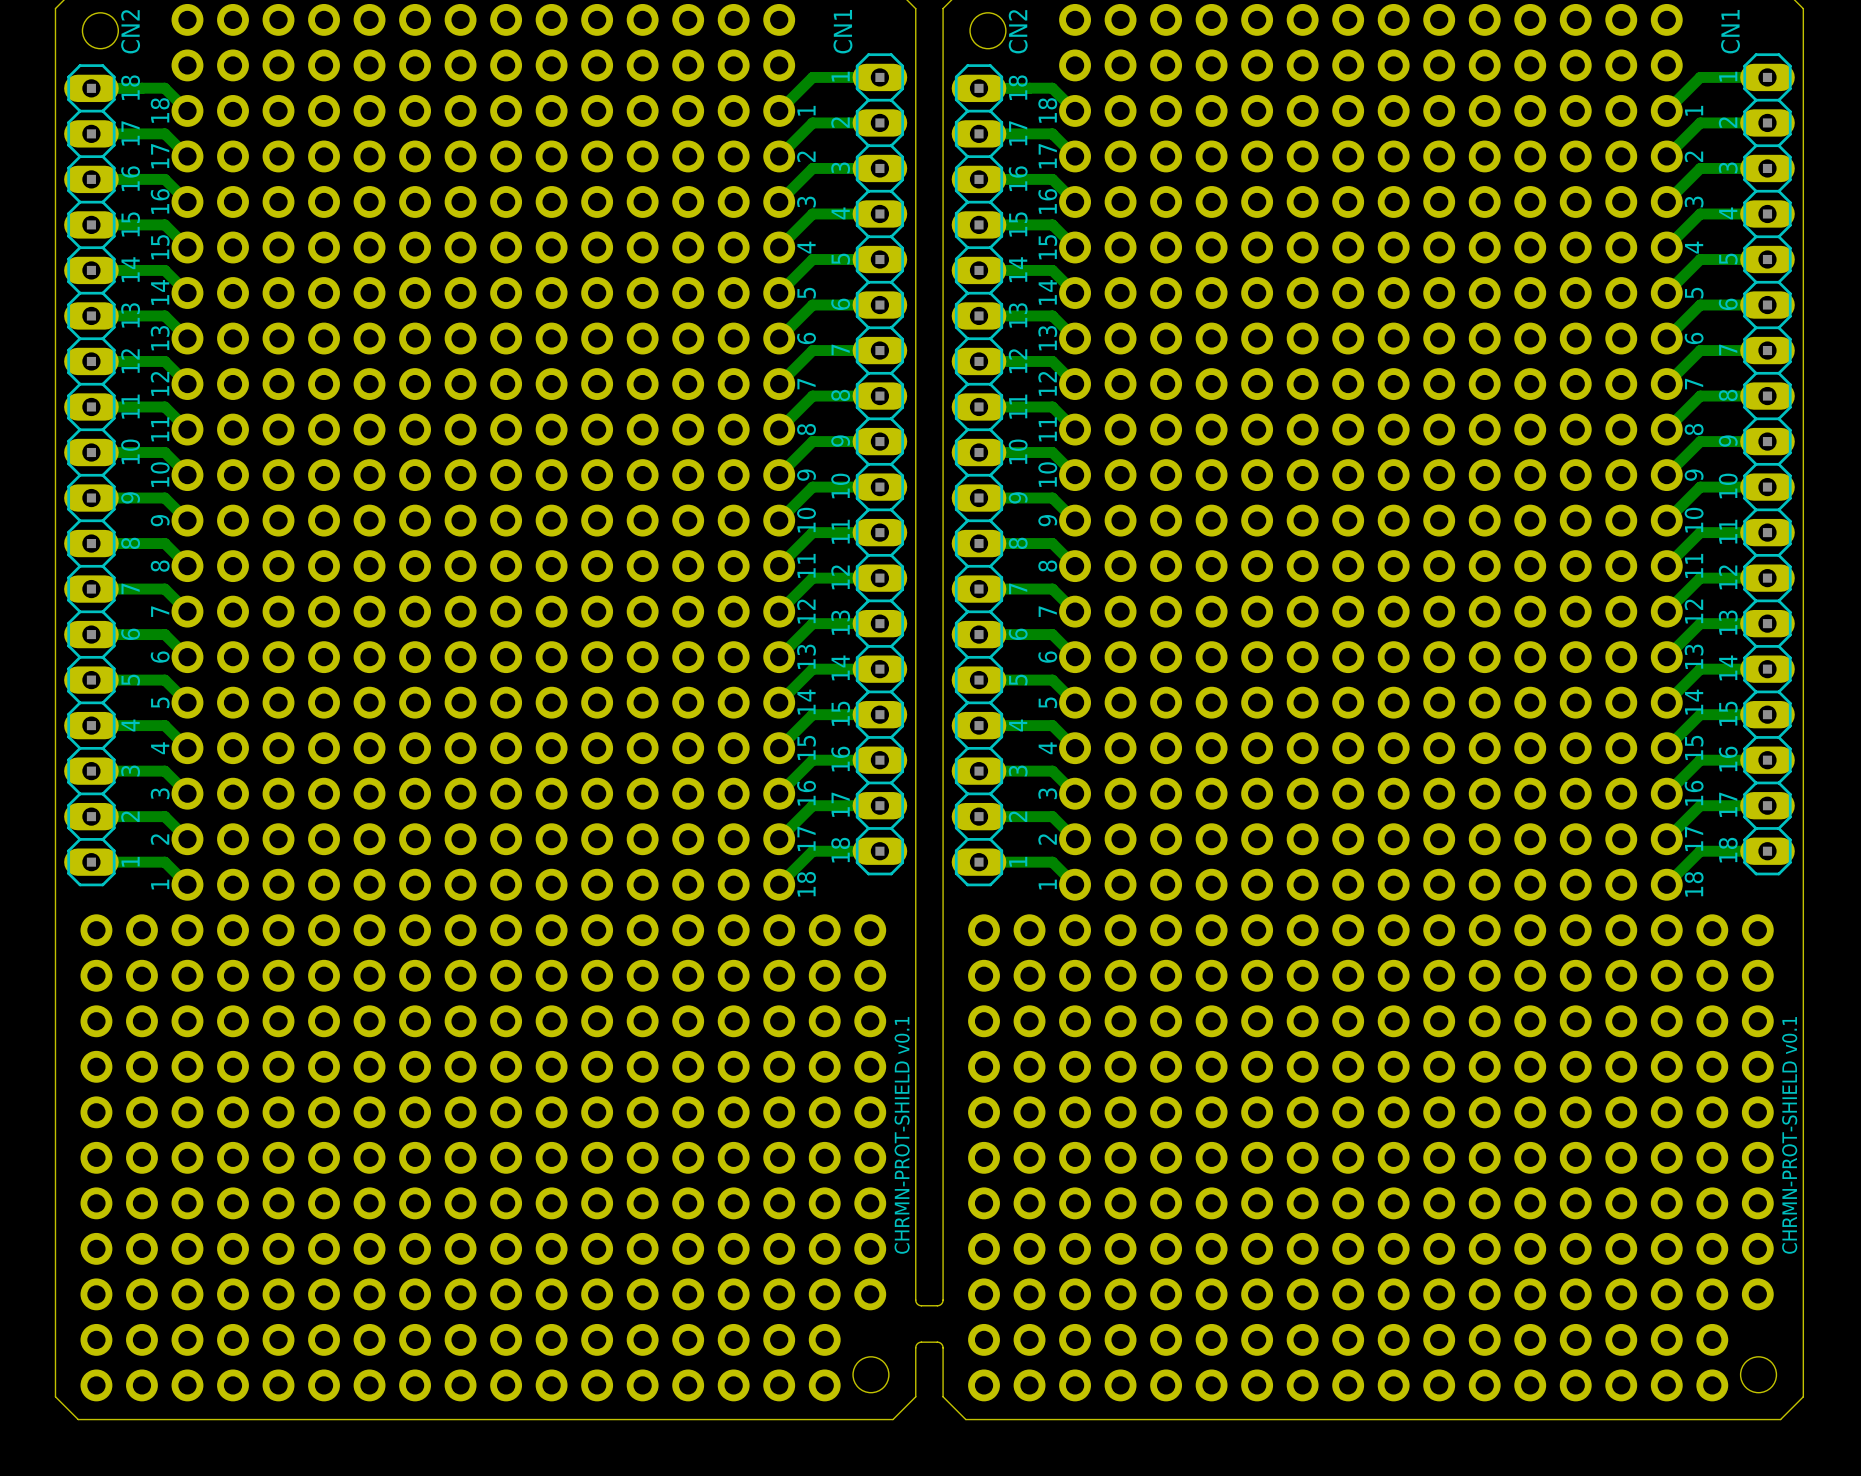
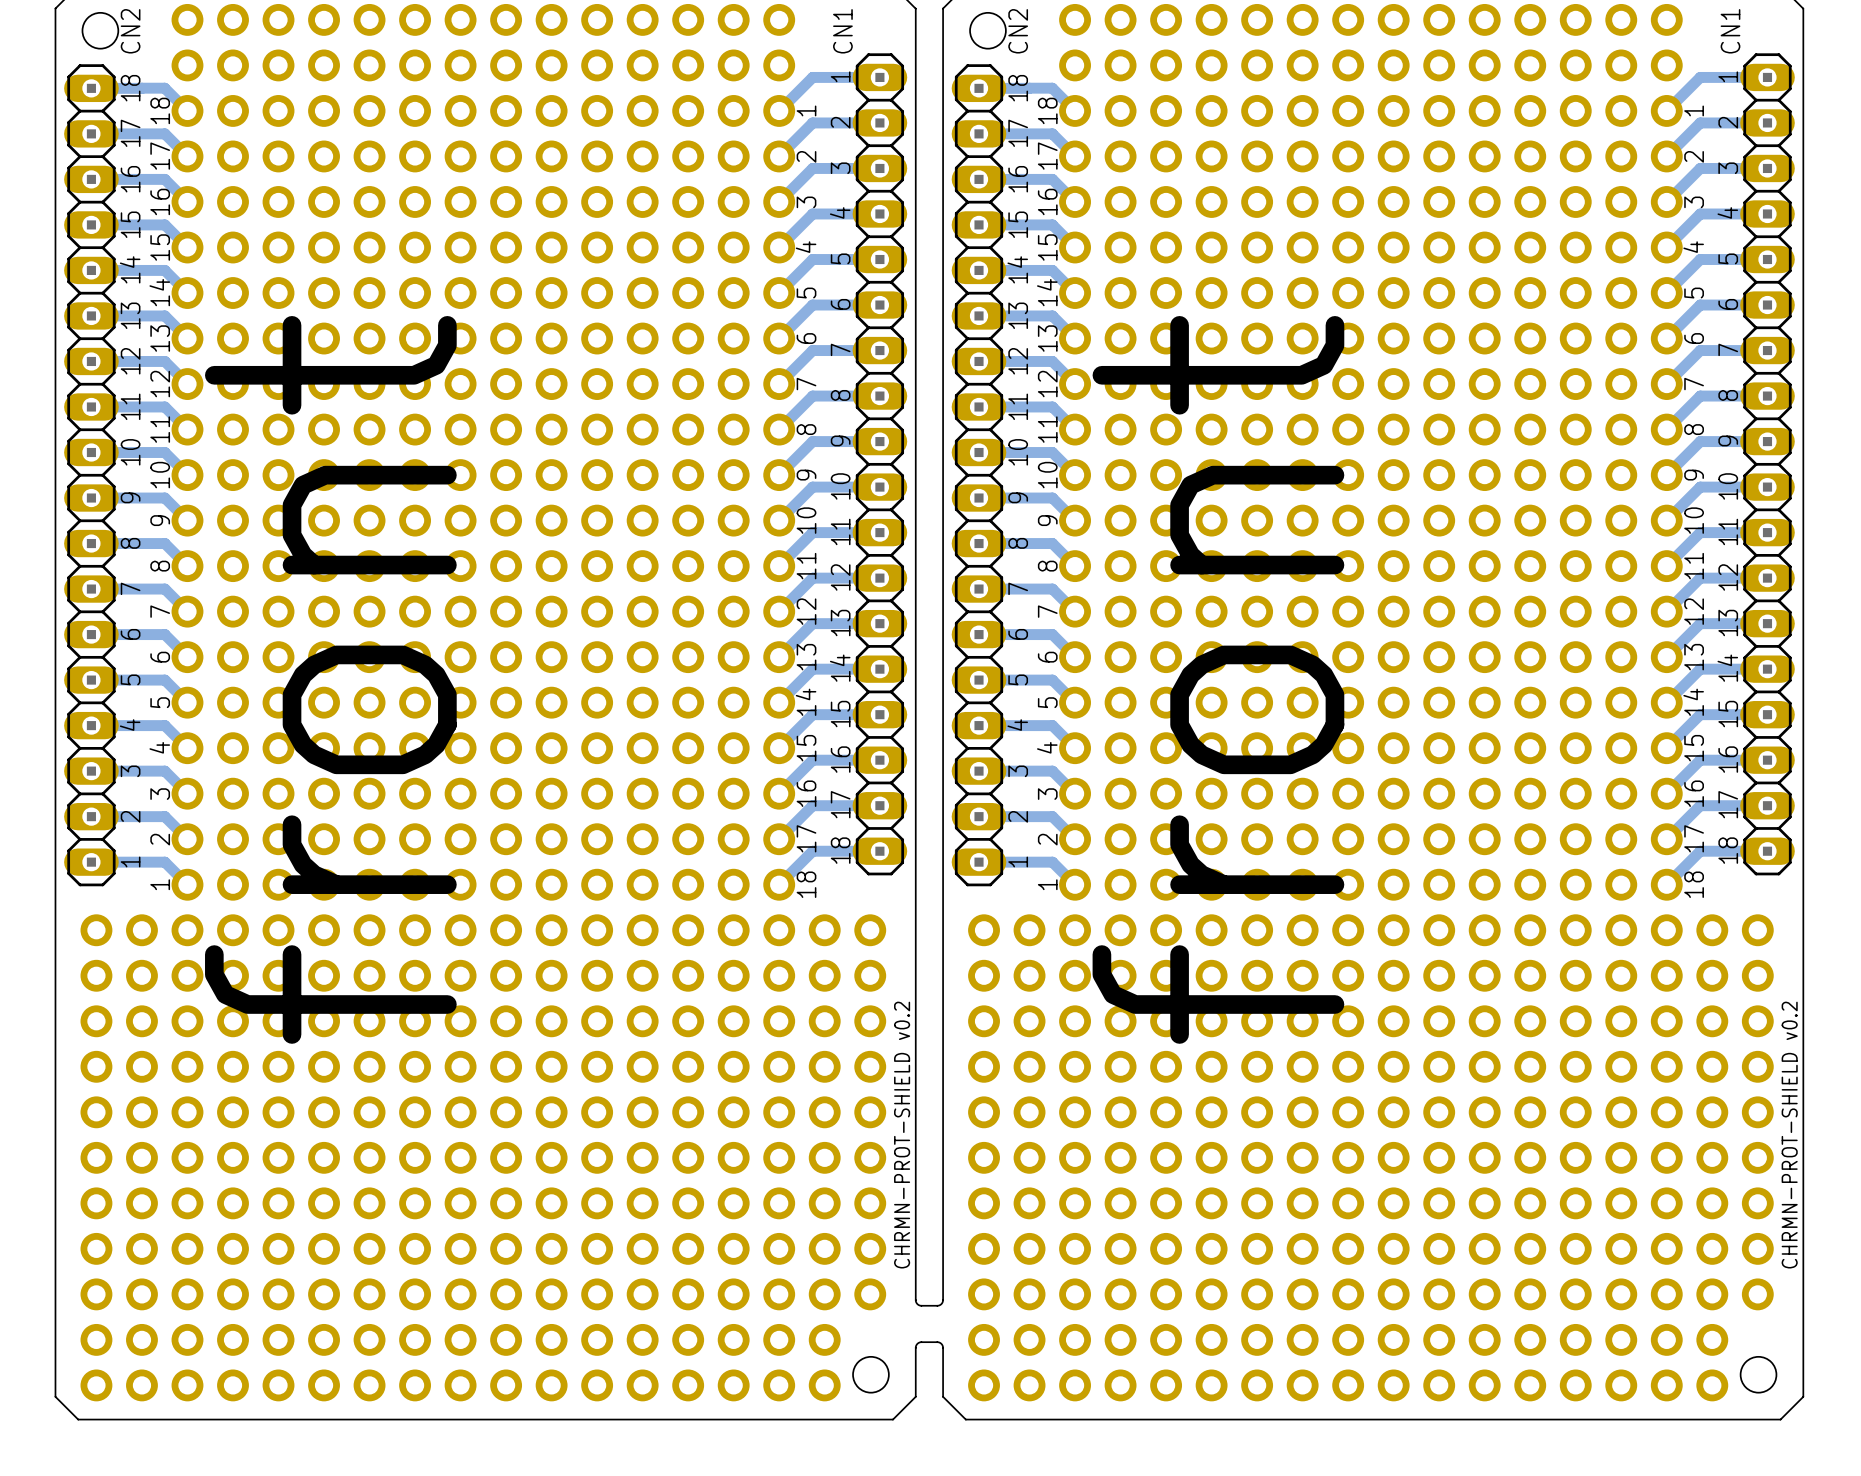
text: none -> front (330, 679)
text: none -> front (1218, 679)
text: CHRMN-PROT-SHIELD v0.1 (902, 1135) -> CHRMN-PROT-SHIELD v0.2 (902, 1135)
text: CHRMN-PROT-SHIELD v0.1 (1789, 1135) -> CHRMN-PROT-SHIELD v0.2 (1789, 1135)

